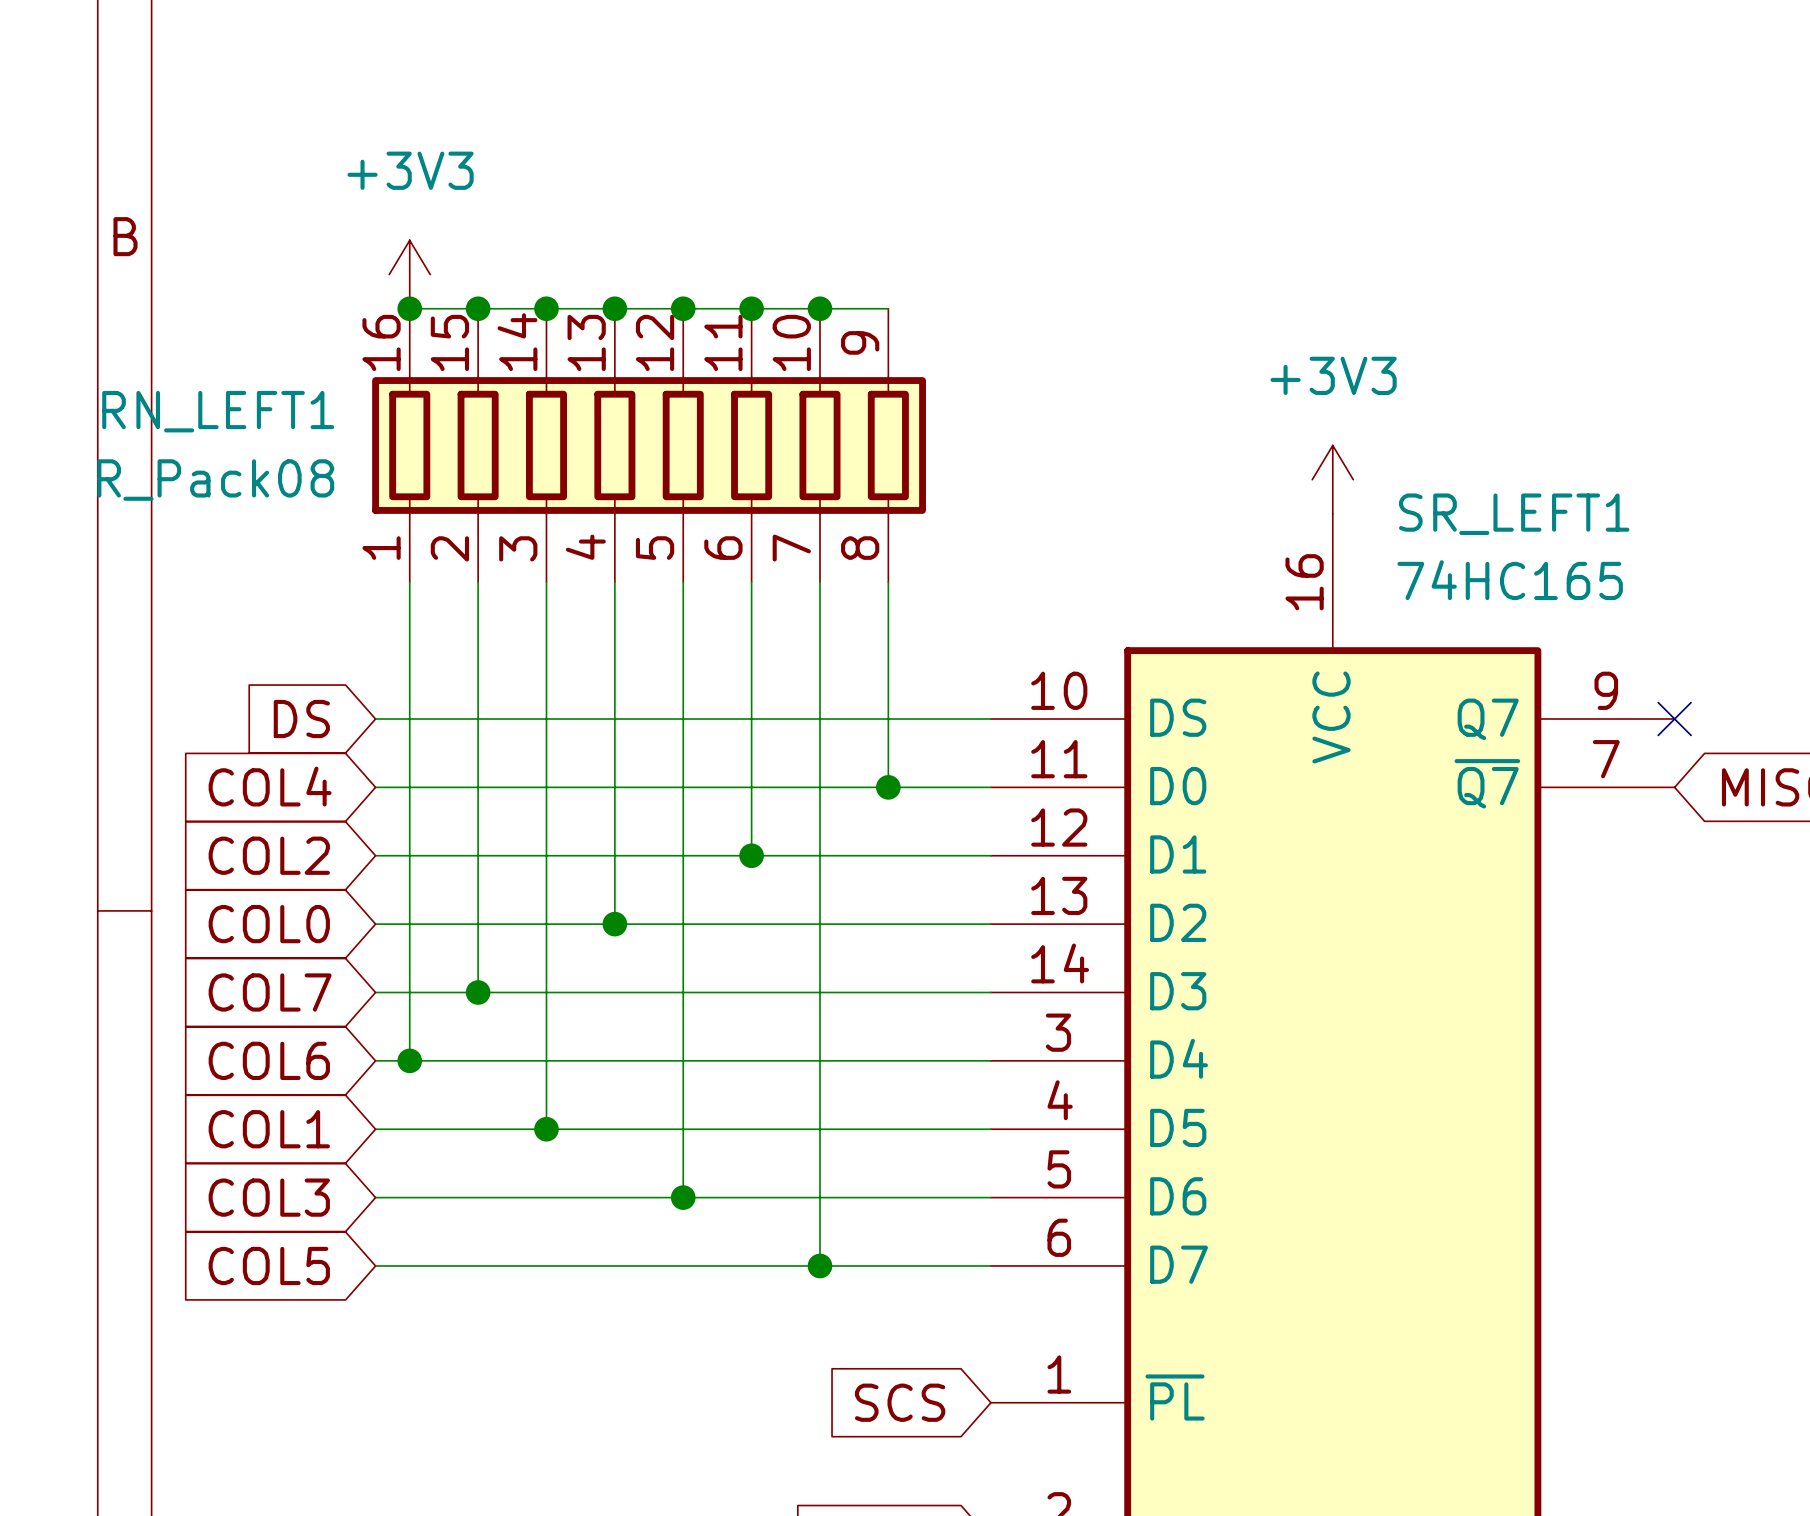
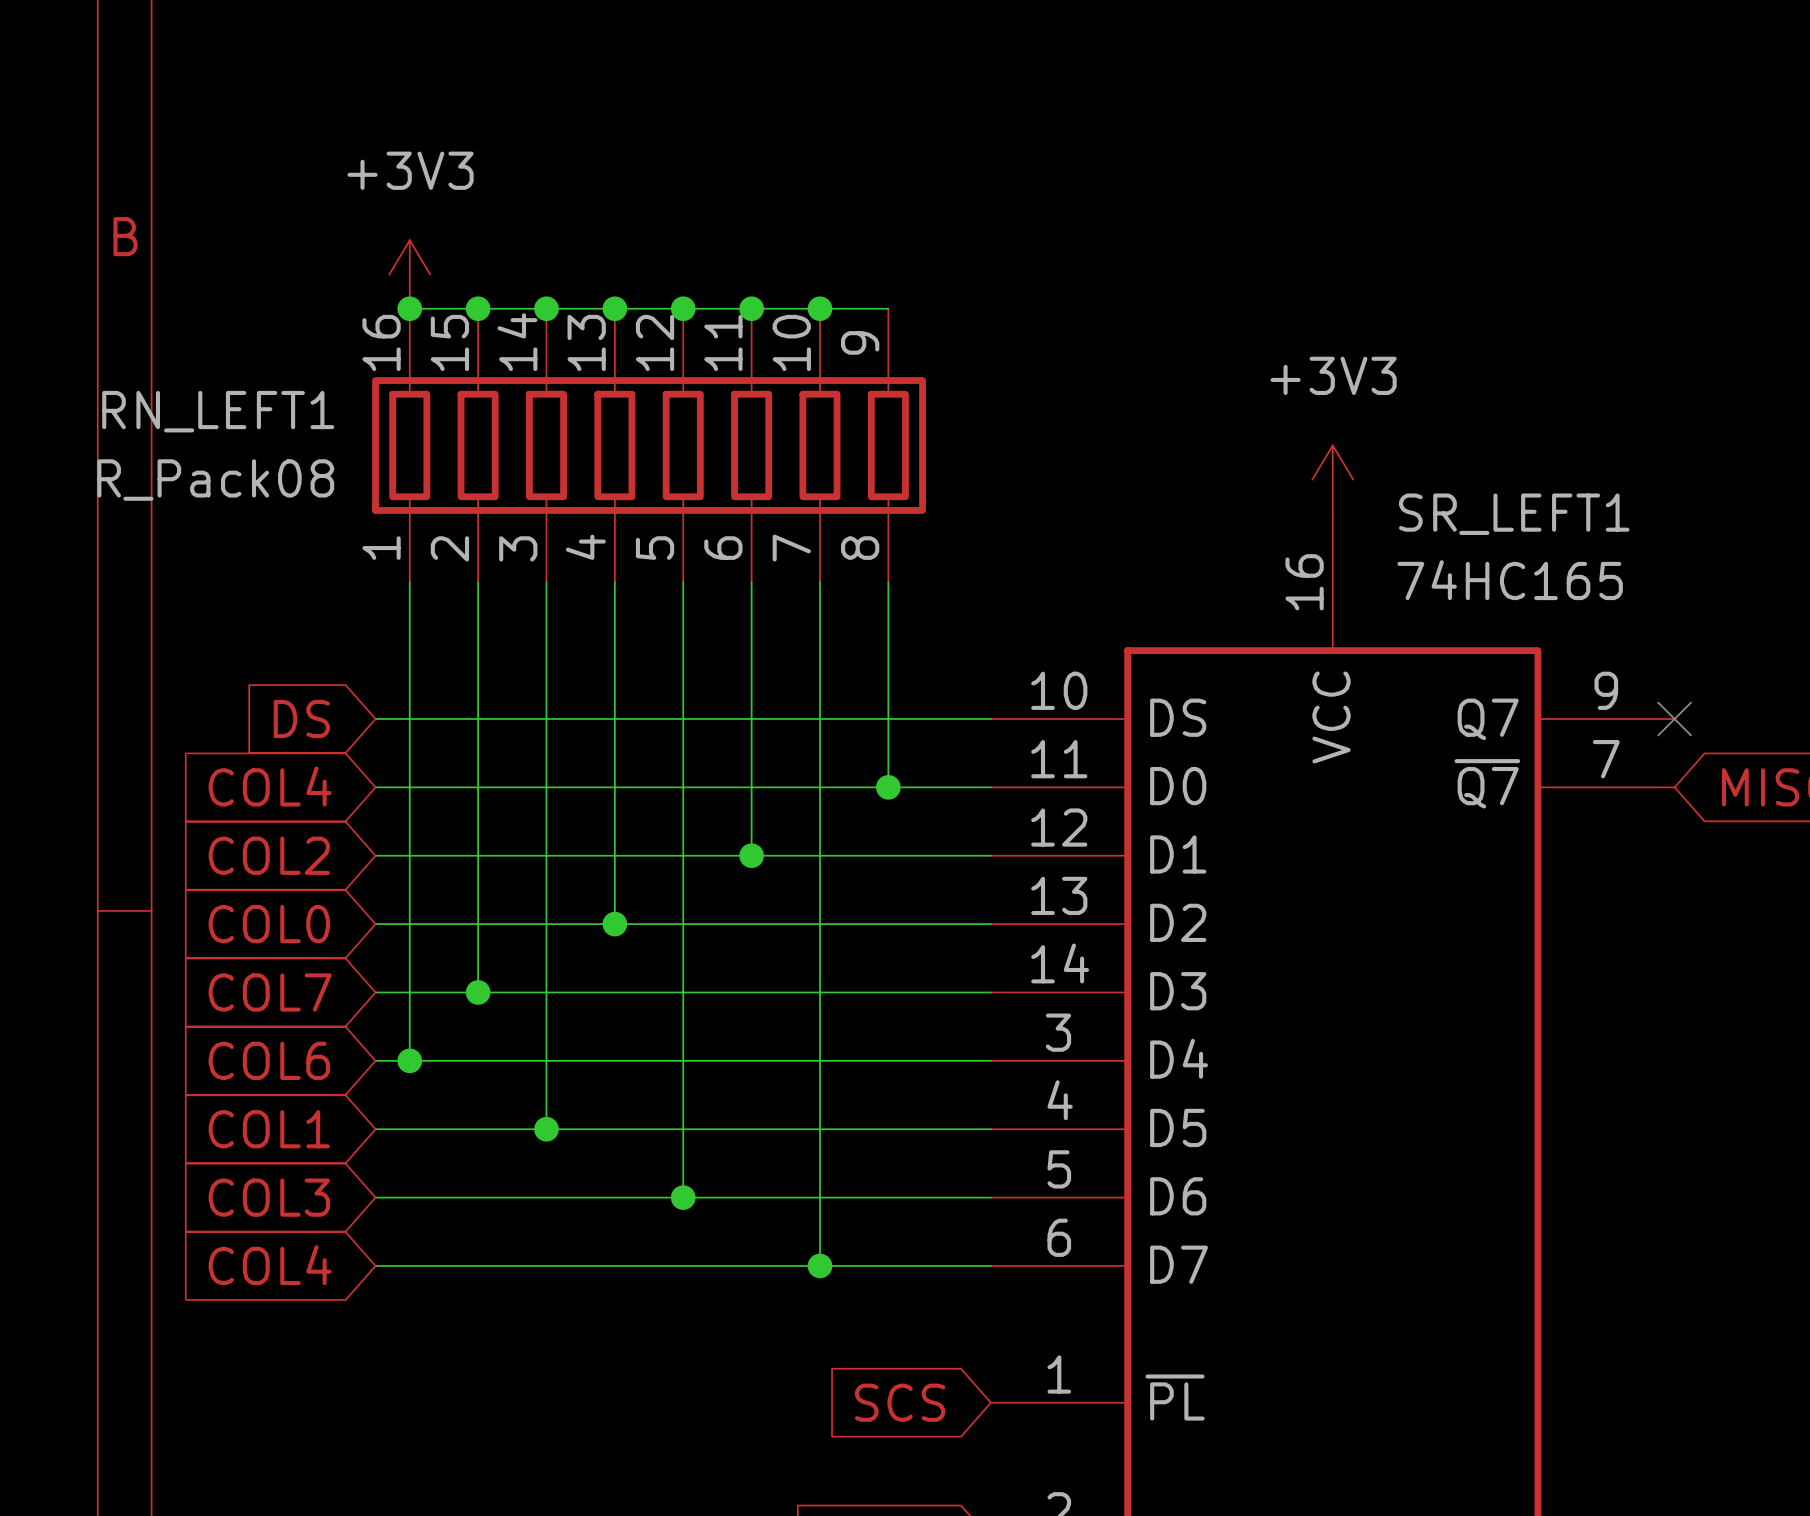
global label: COL5 (269, 1265) -> COL4 (270, 1265)

